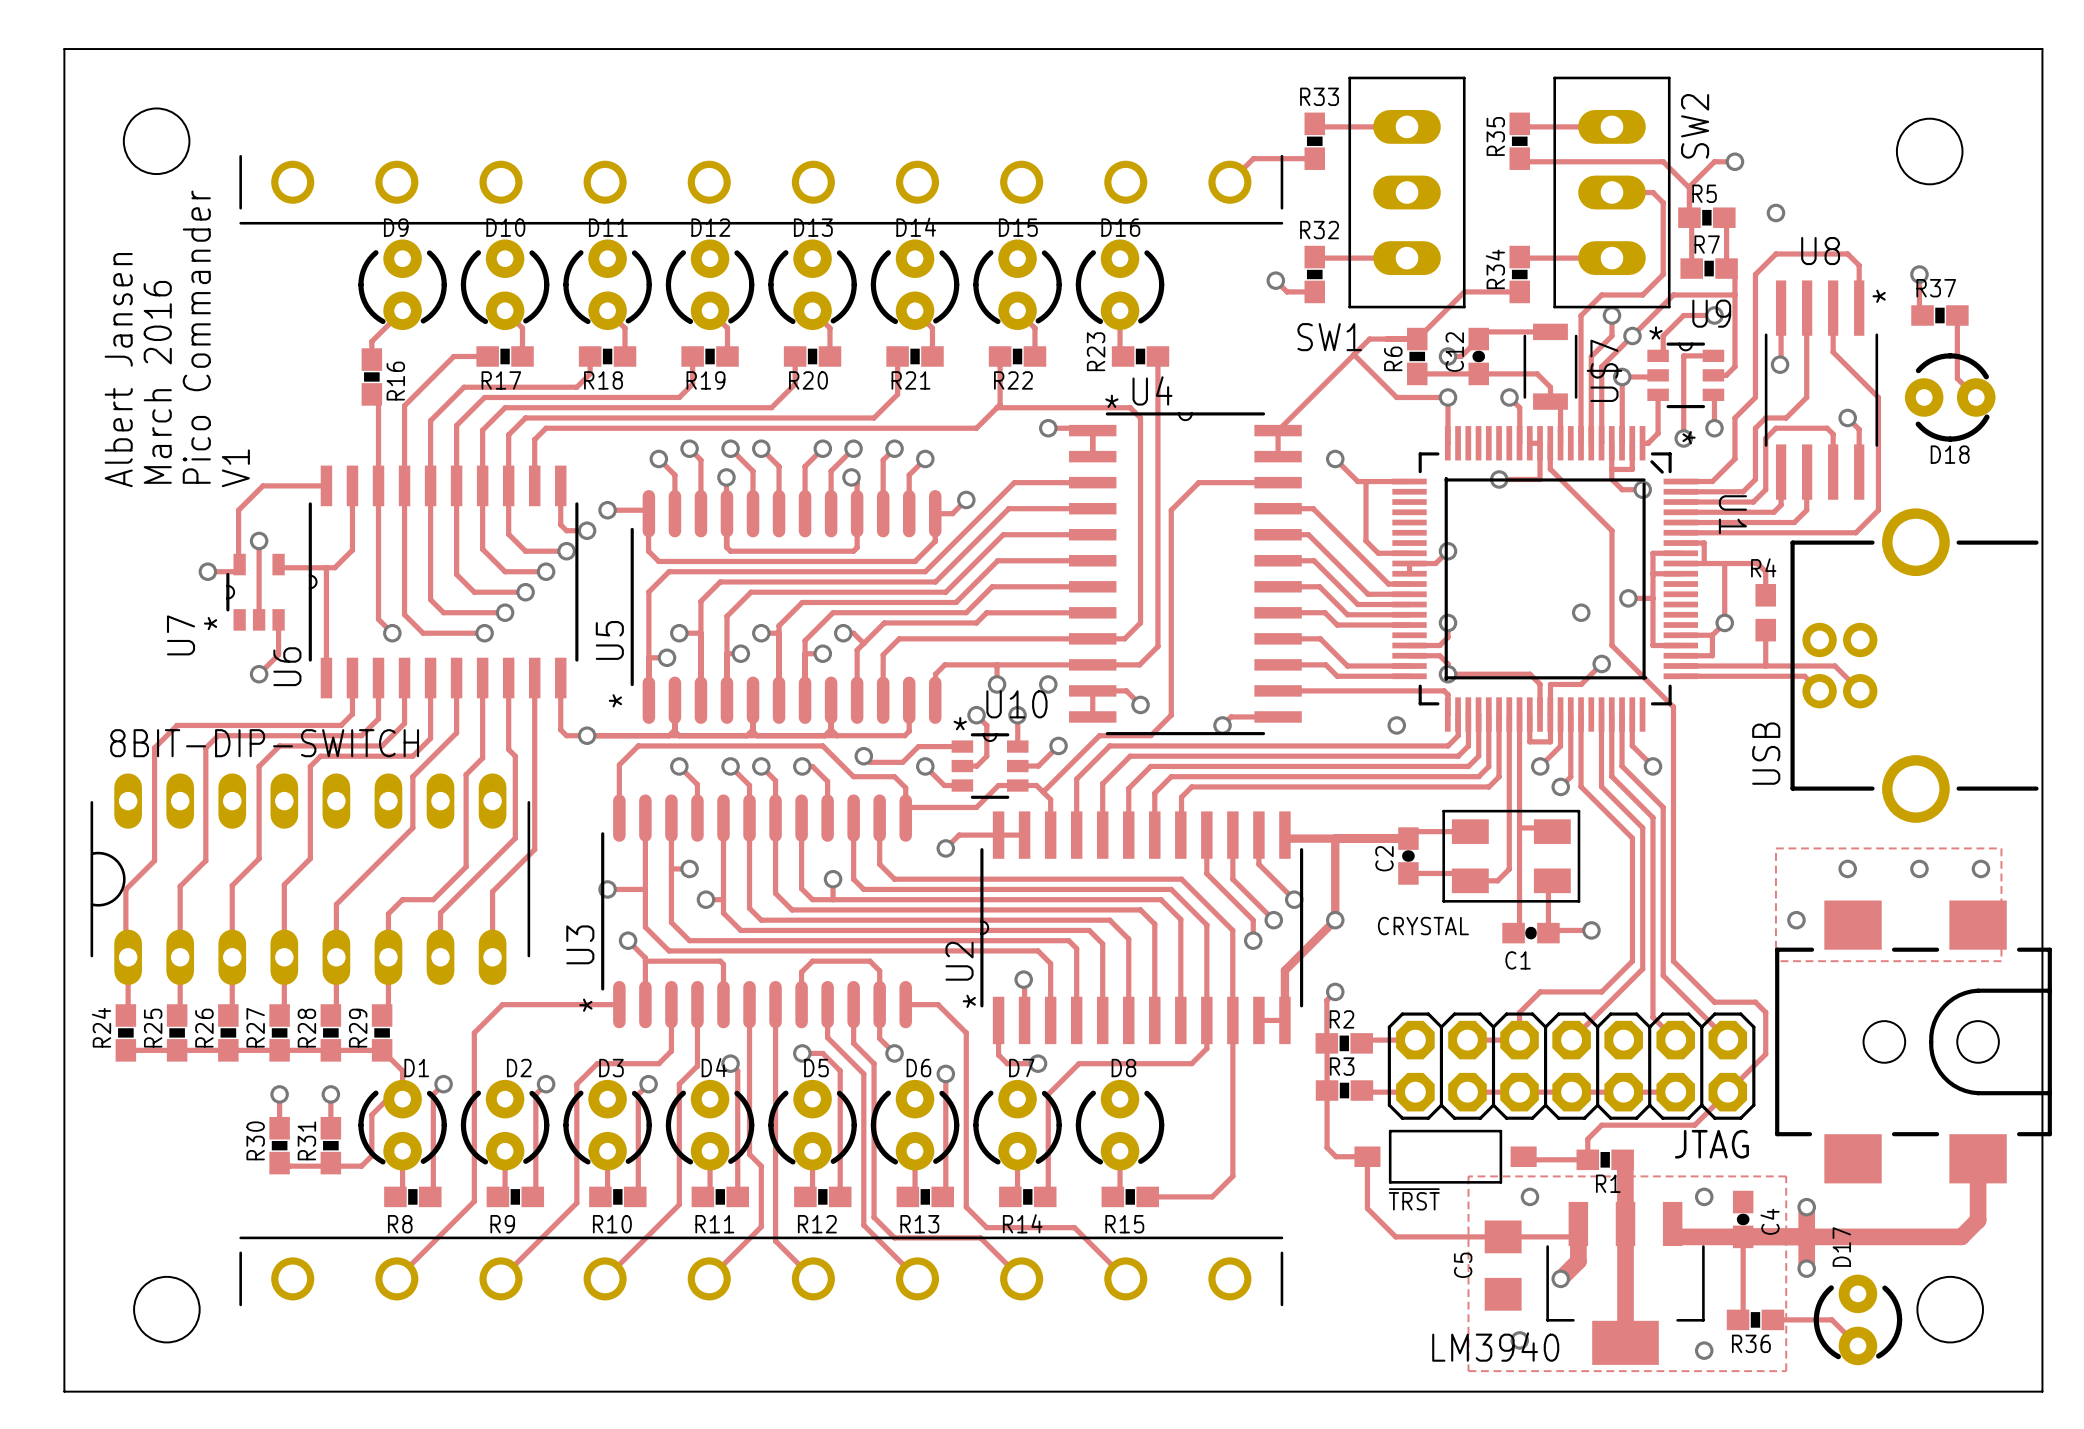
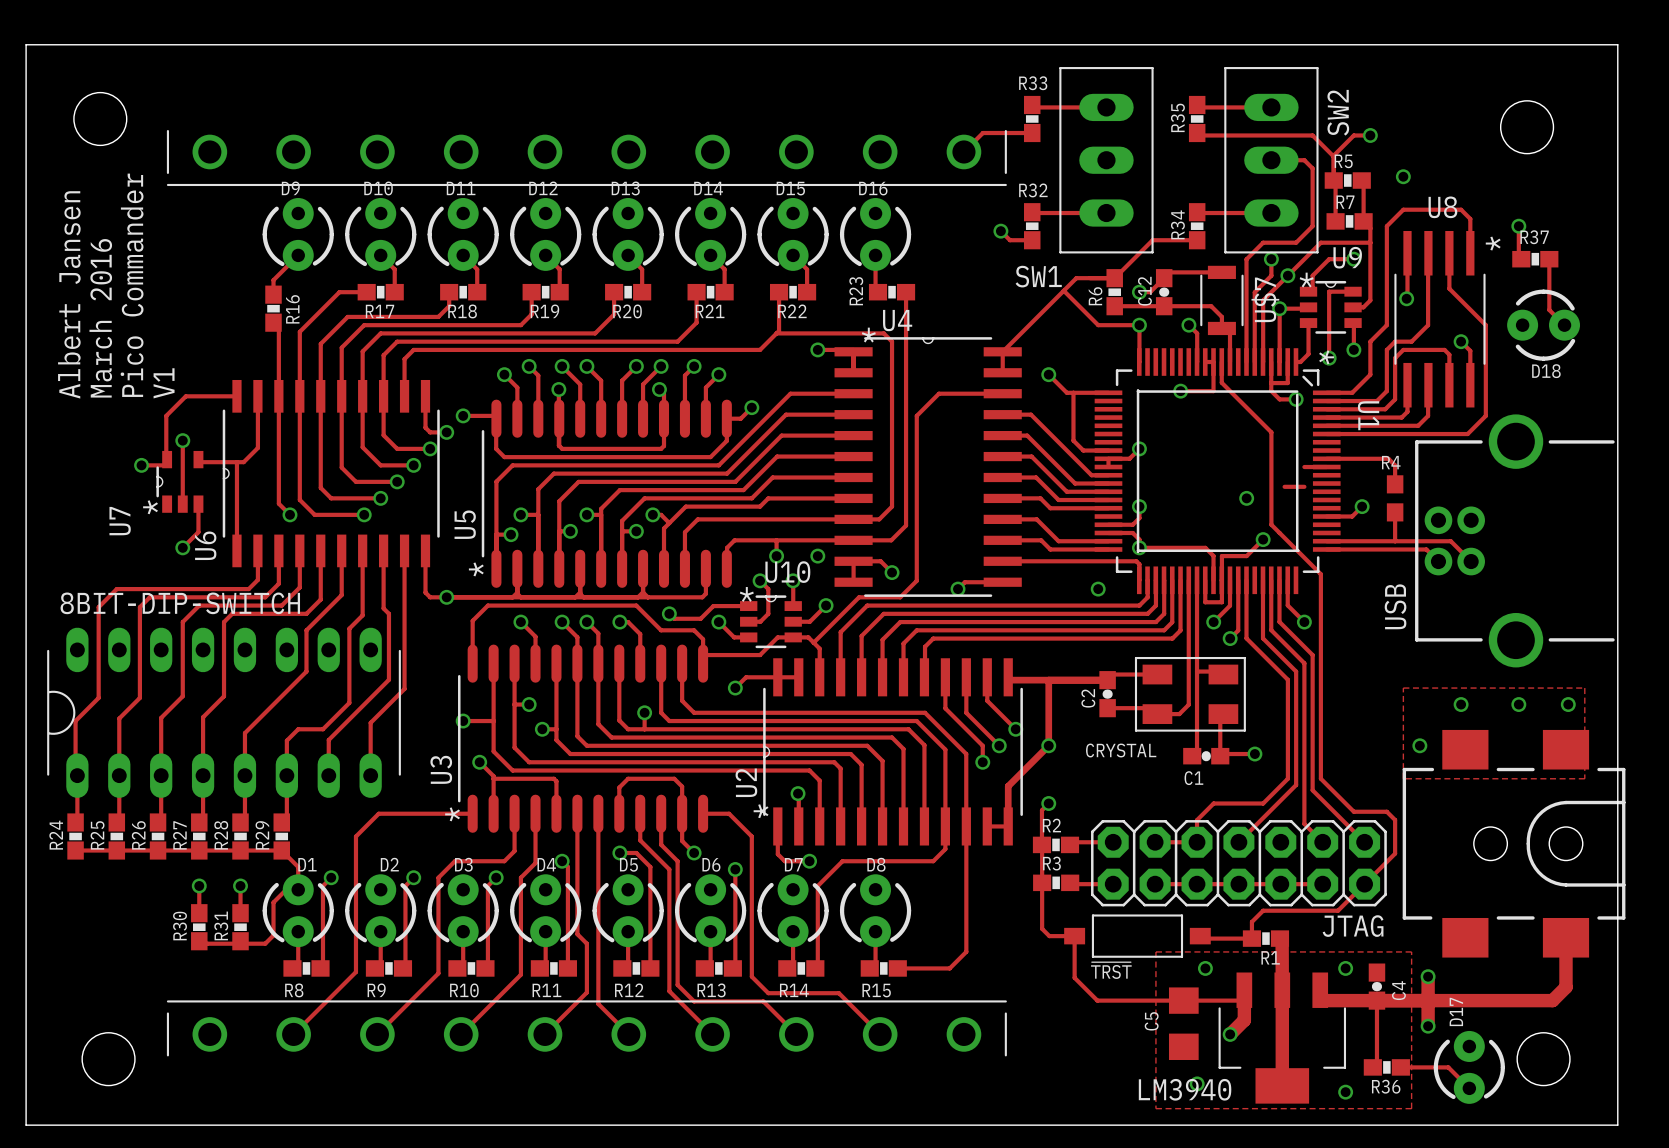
track: (1680, 543) (1704, 543) (1704, 563) -> none
track: (1680, 553) (1652, 553) (1652, 645) (1680, 645) -> none
track: (1724, 563) (1724, 622) -> none
via: (1628, 598) -> none
track: (1712, 635) (1712, 655) (1680, 655) -> none

